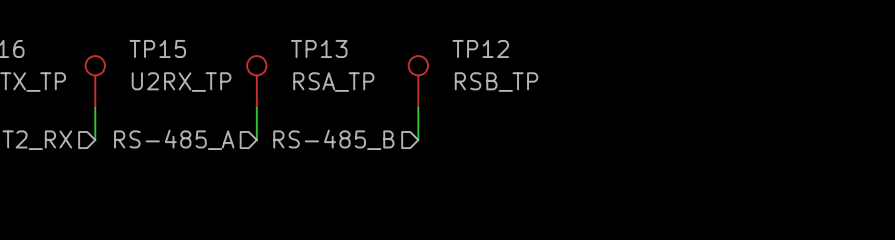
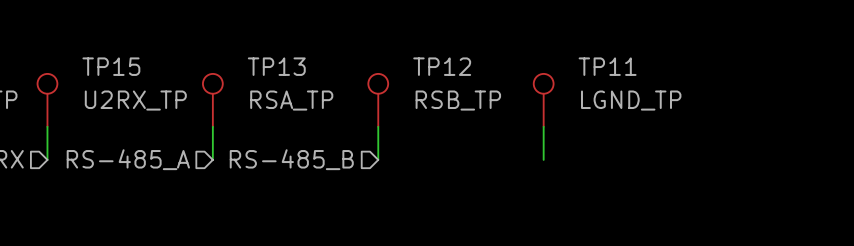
TP11: none -> LGND_TP (543, 100)
wire: none -> (543, 126) (543, 159)

